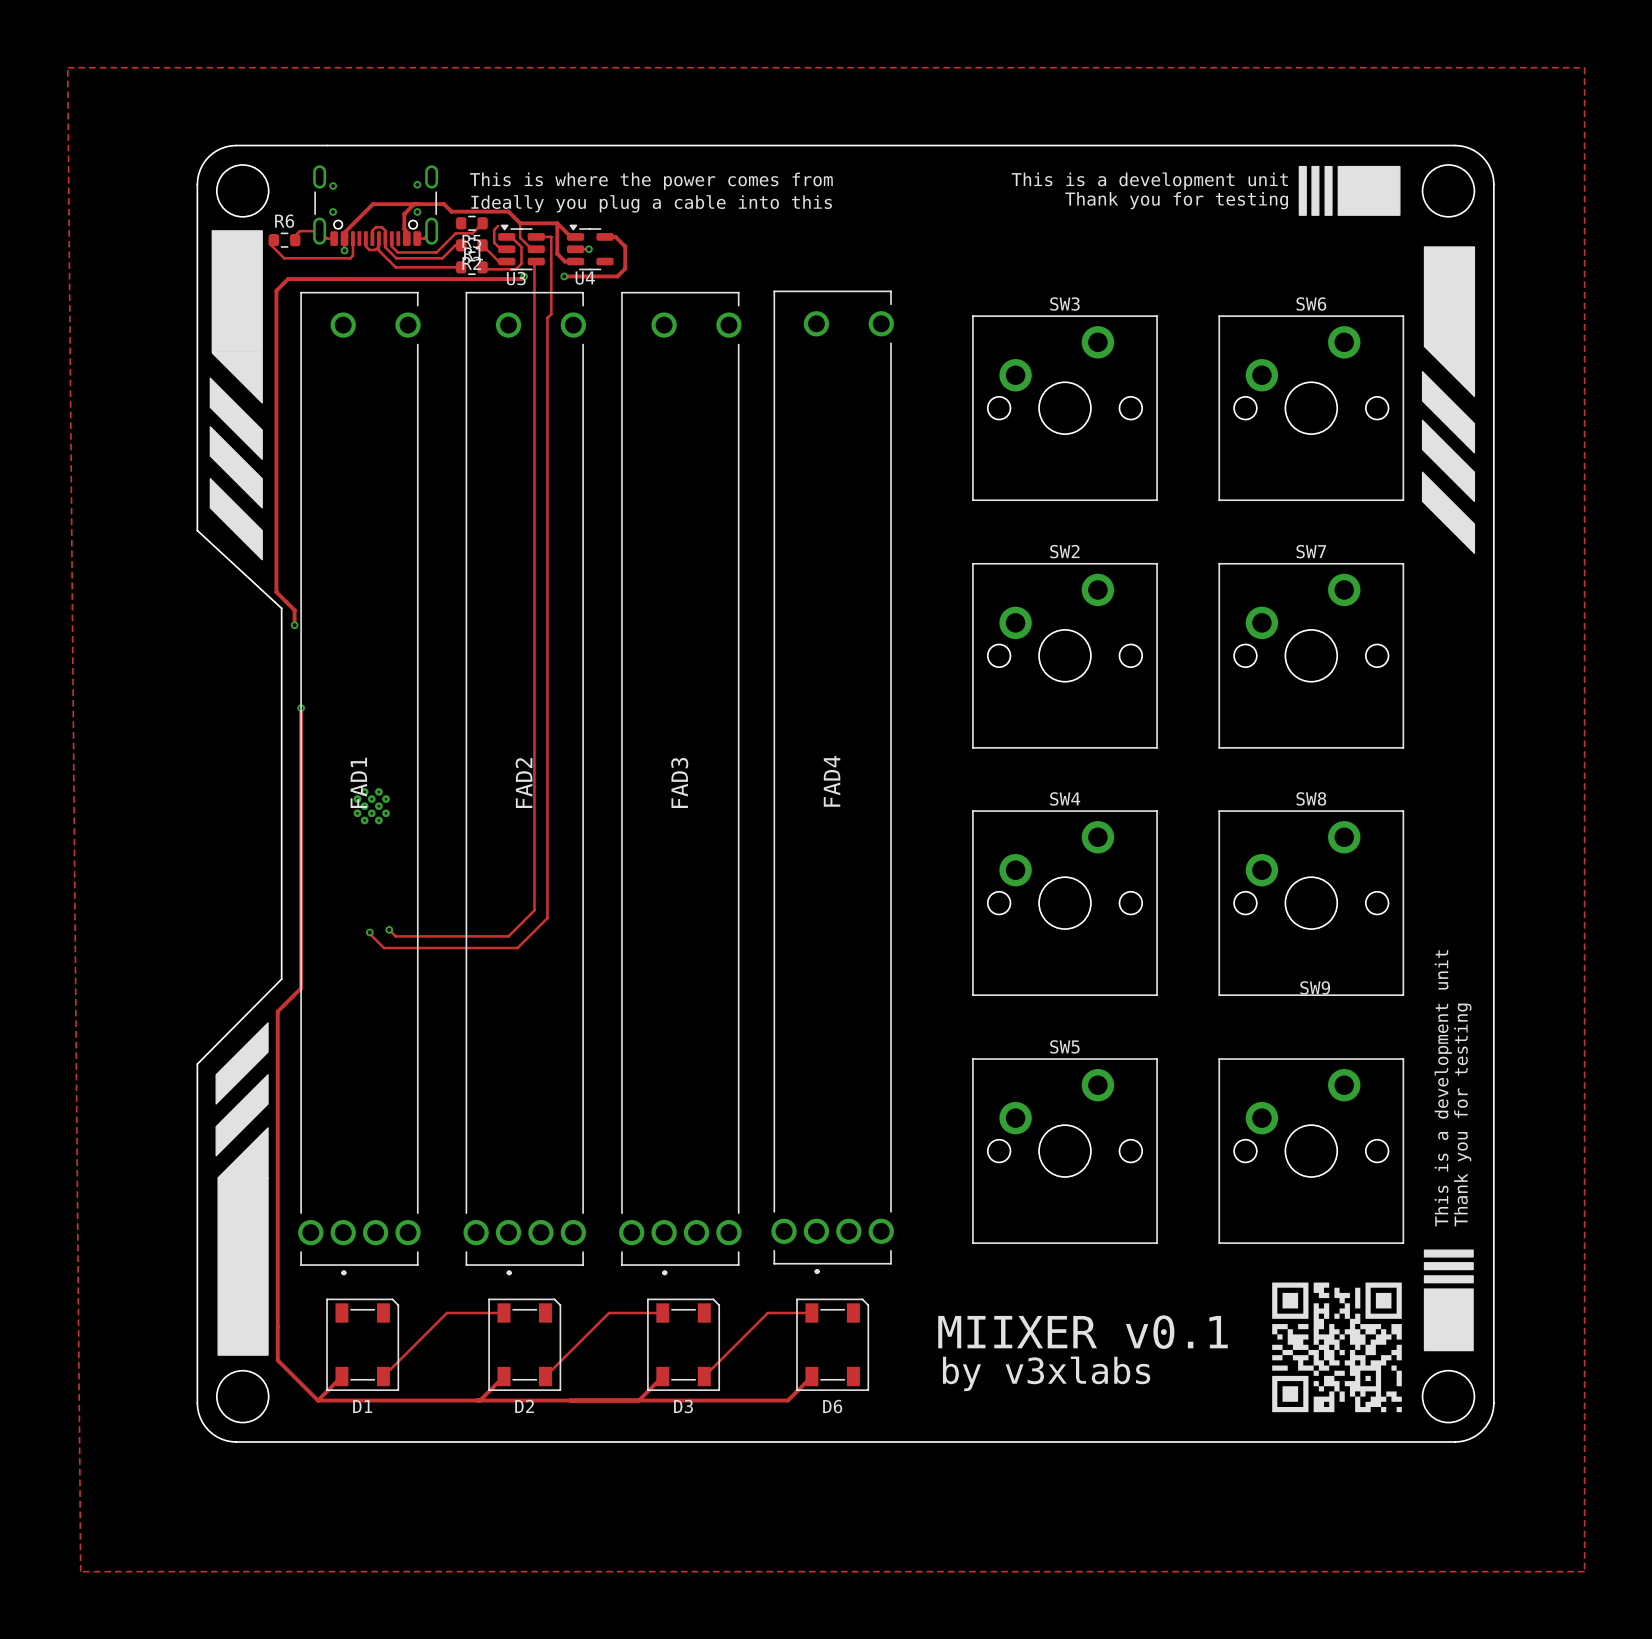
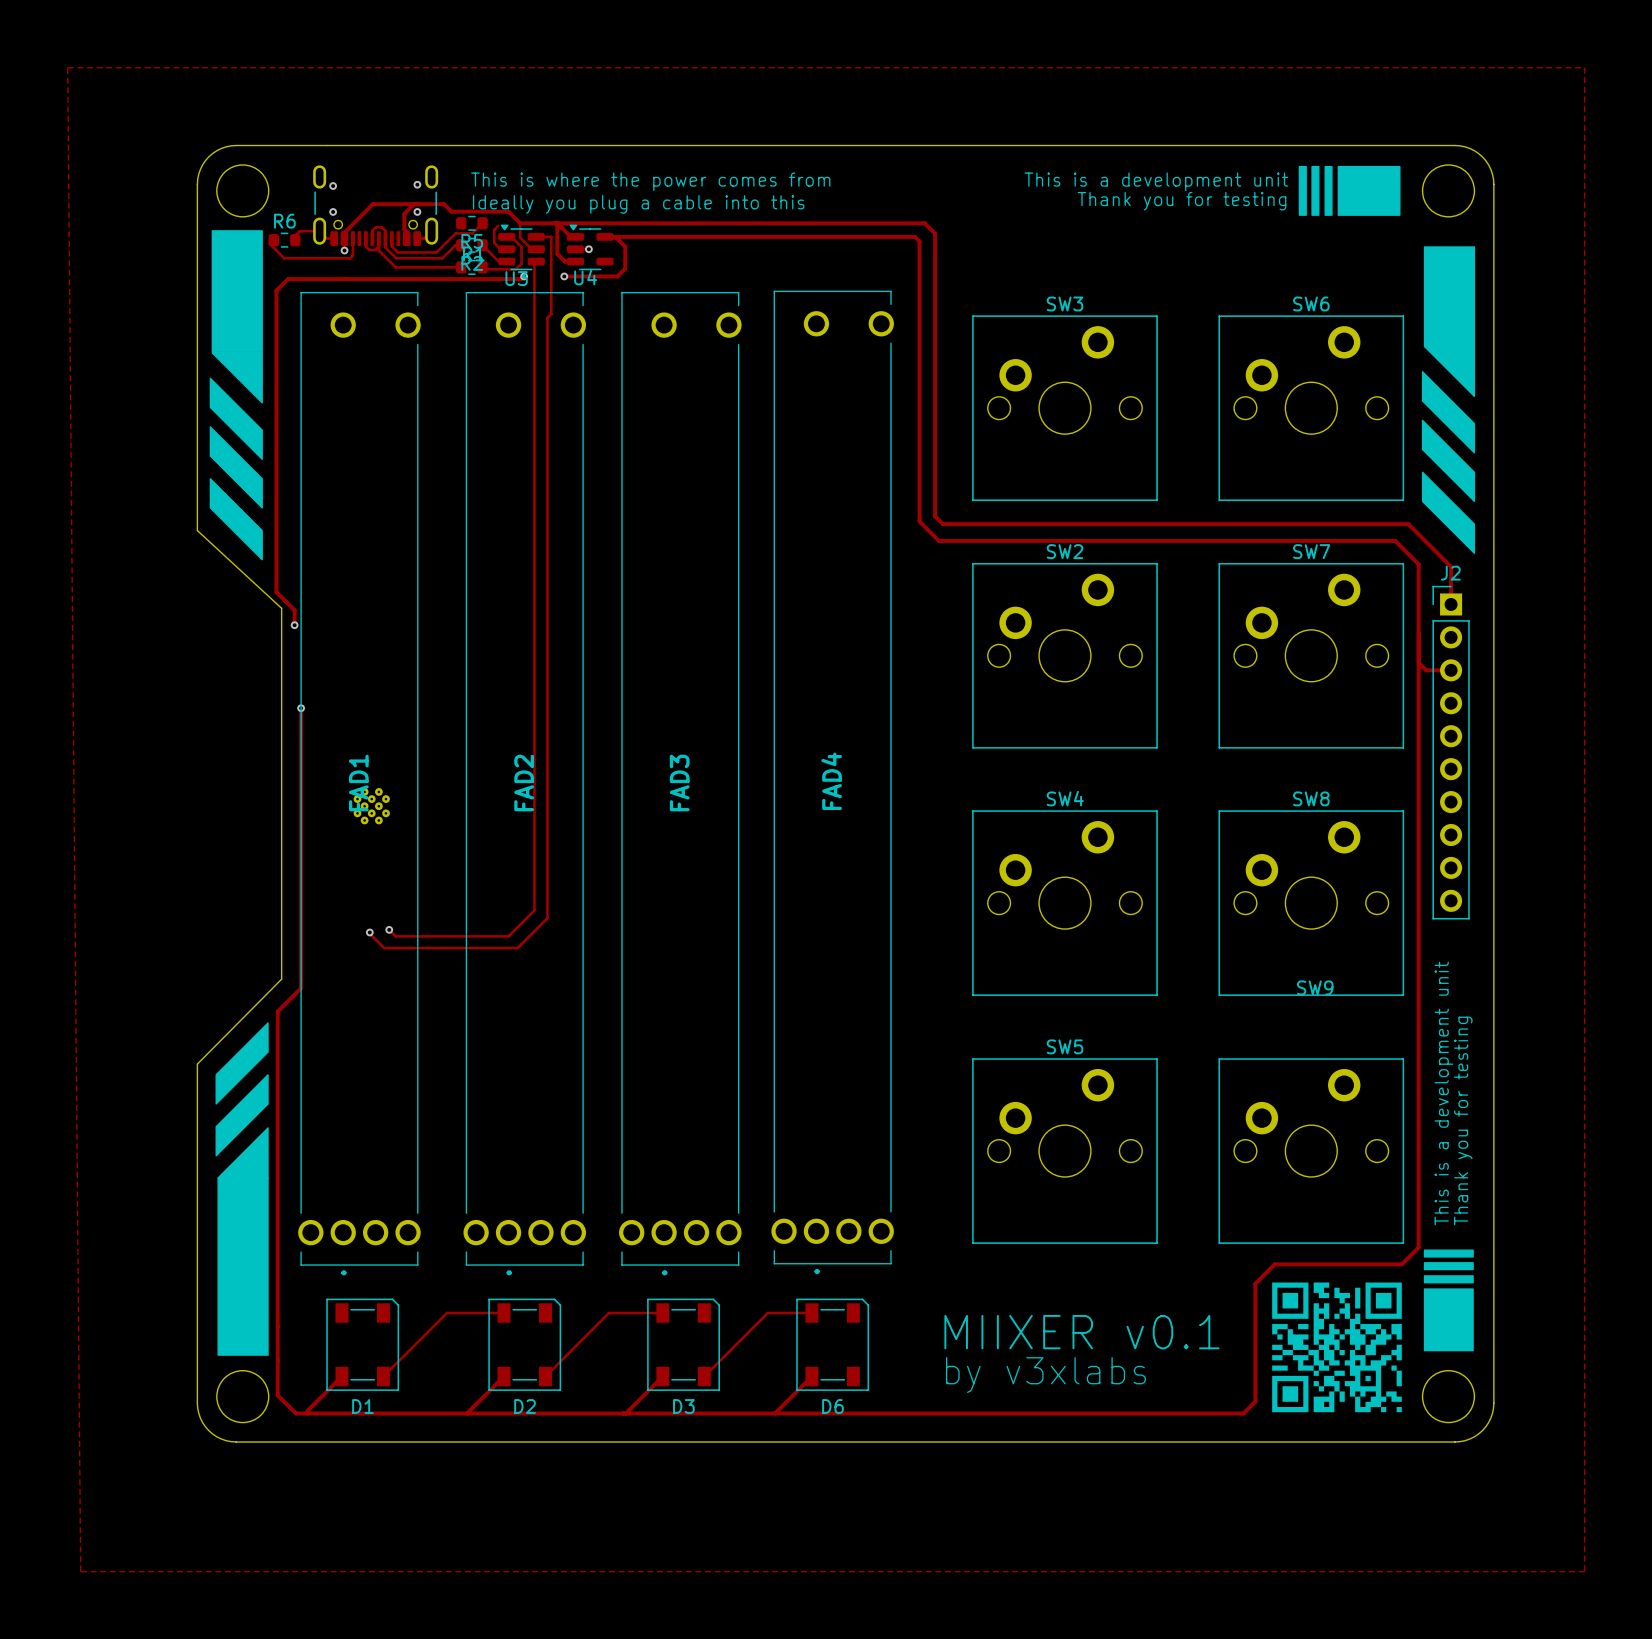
track: none -> (557, 223) (924, 223) (935, 233) (935, 516) (942, 524) (1408, 524) (1451, 566) (1451, 604)
track: none -> (615, 236) (914, 236) (919, 241) (919, 521) (938, 540) (1395, 540) (1418, 564) (1418, 1247) (1401, 1264) (1274, 1264) (1255, 1283) (1255, 1401) (1243, 1413) (295, 1413) (277, 1395) (277, 1360)
track: none -> (1418, 662) (1426, 670) (1451, 670)
J2: none -> (1451, 752)
track: (277, 1360) (317, 1400) (787, 1400) -> (774, 1413) (787, 1400)
track: none -> (317, 1400) (307, 1410) (307, 1413)
track: none -> (480, 1400) (467, 1413)
track: none -> (638, 1400) (625, 1413)

